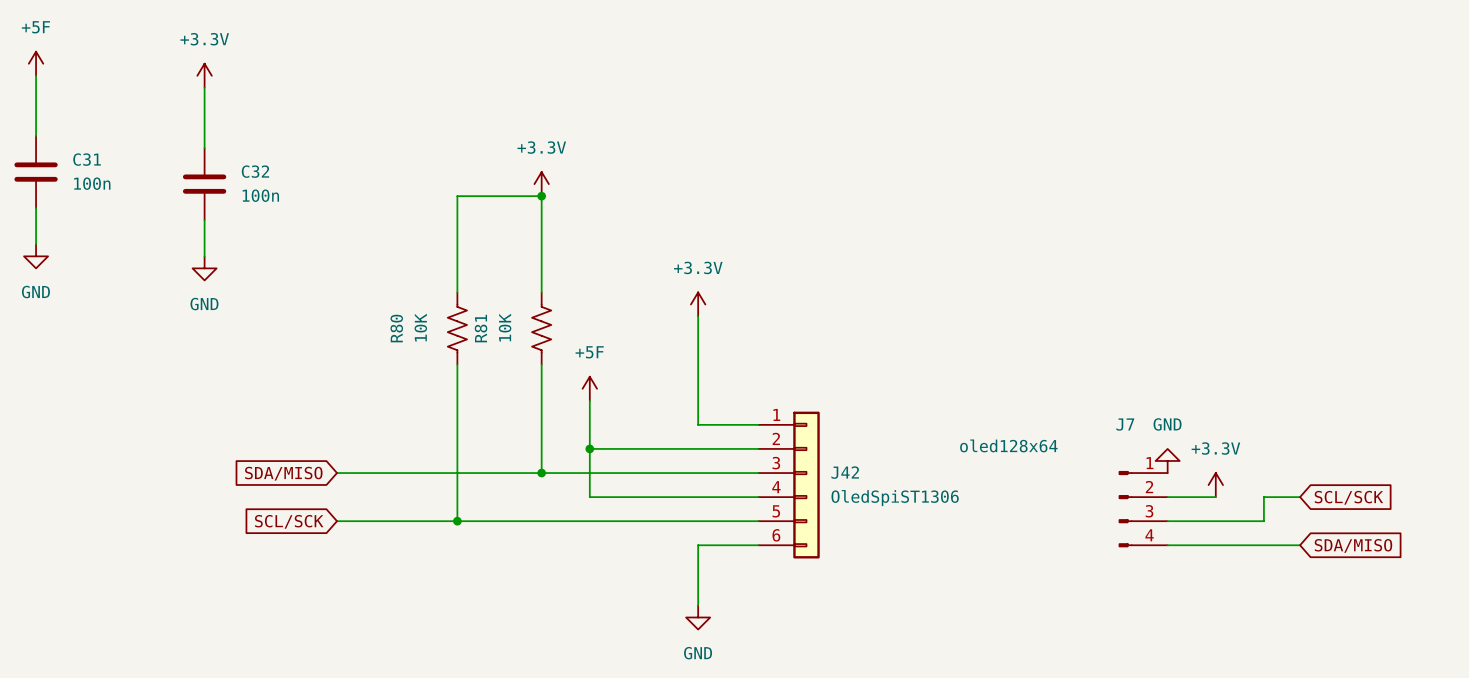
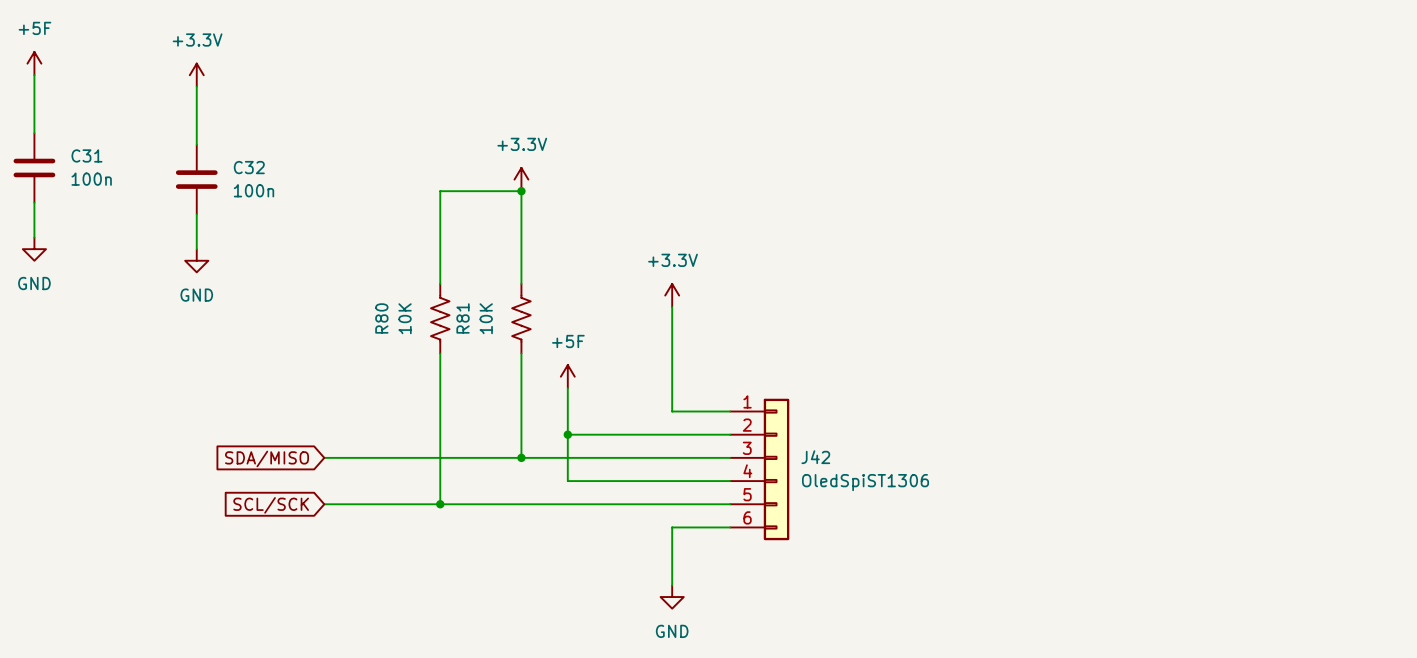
power symbol: GND (1167, 460) -> none
power symbol: +3.3V (1215, 485) -> none
wire: (1167, 497) (1215, 497) -> none
wire: (1300, 497) (1263, 497) (1263, 521) (1167, 521) -> none
global label: SCL/SCK (1348, 497) -> none
J7: oled128x64 (1143, 509) -> none
wire: (1167, 545) (1300, 545) -> none
global label: SDA/MISO (1353, 545) -> none

